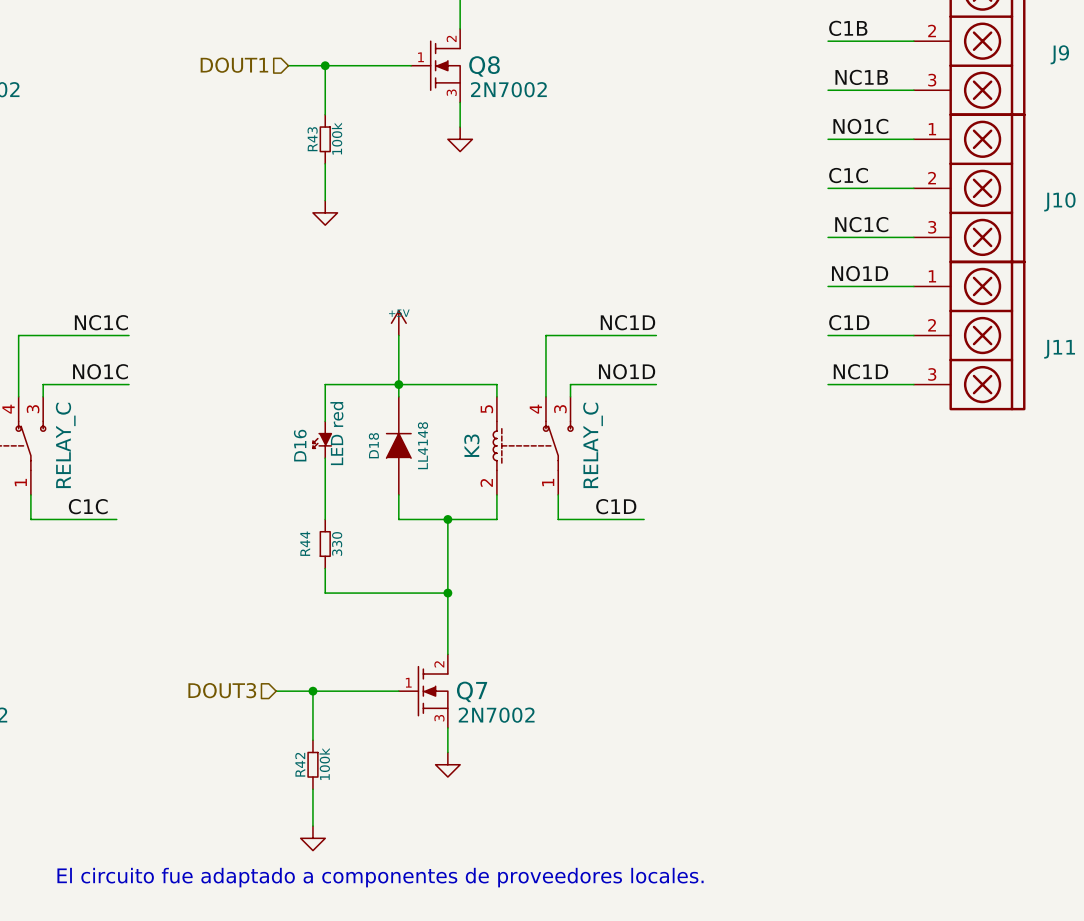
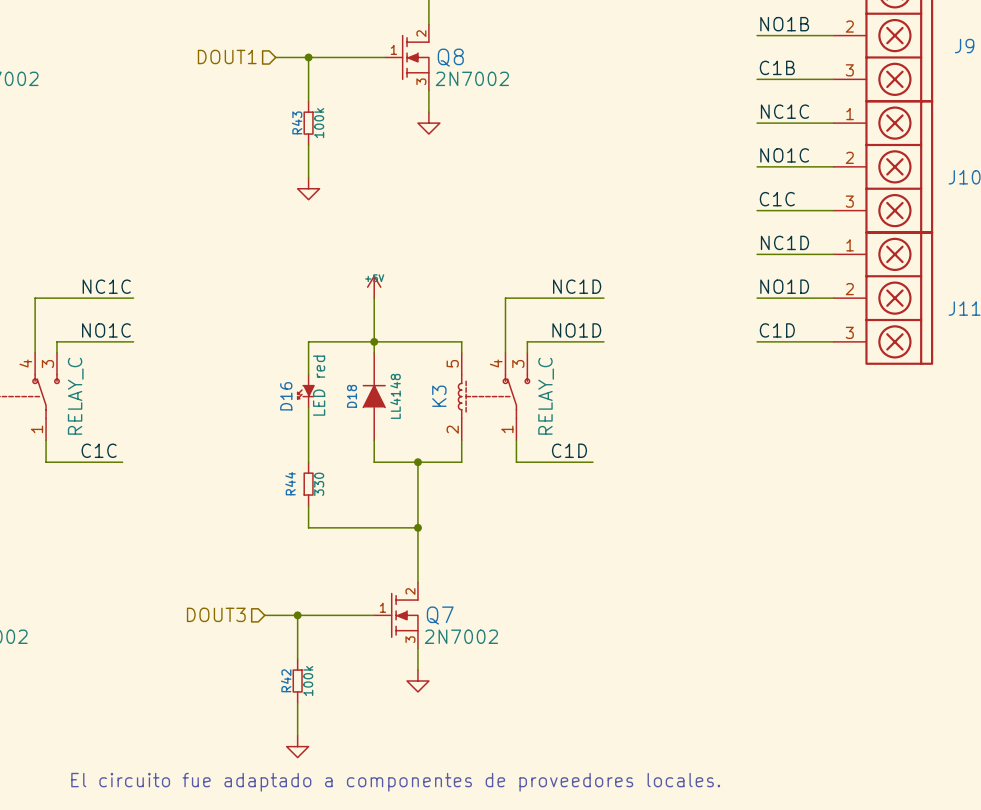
label position: C1B (848, 28) -> C1B (777, 67)
label: none -> NO1B (784, 24)
label: NC1B (861, 77) -> none
label: NO1C (860, 126) -> NC1C (784, 111)
label position: C1C (848, 175) -> C1C (777, 199)
label: none -> NO1C (784, 155)
label: NC1C (861, 224) -> none
label: NO1D (860, 273) -> NC1D (784, 242)
label position: C1D (849, 322) -> C1D (777, 330)
label: none -> NO1D (784, 286)
label: NC1D (860, 371) -> none

